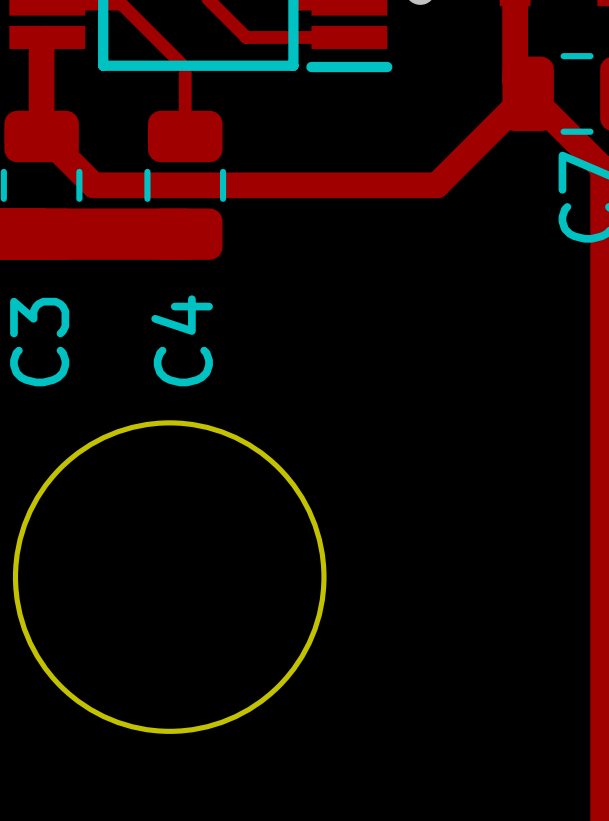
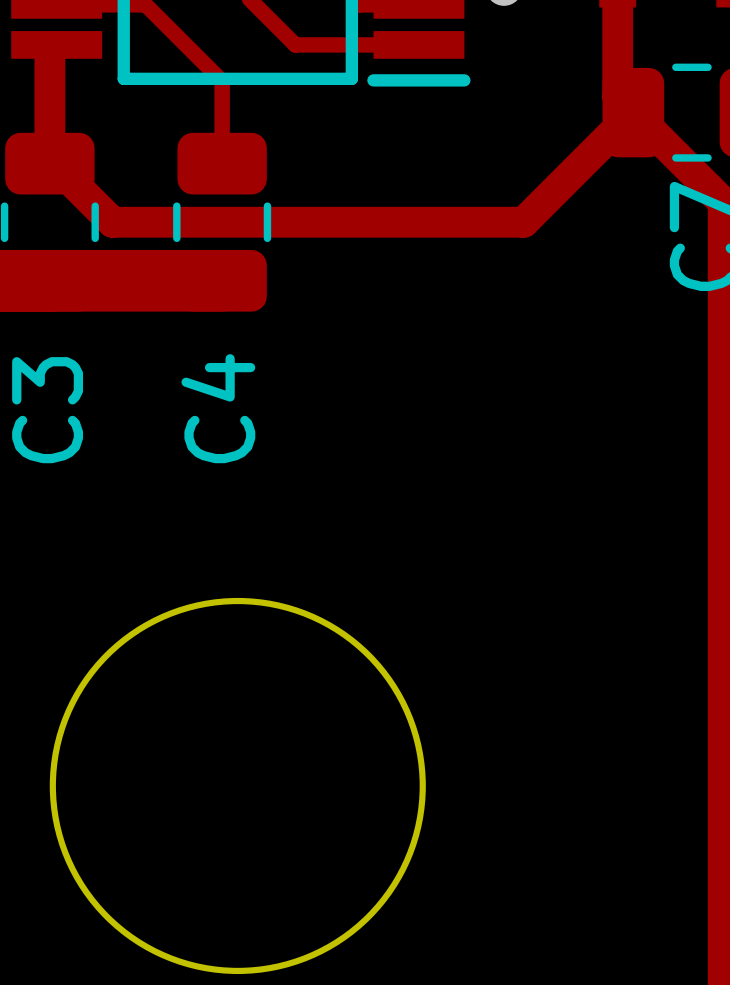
round board edge position: (169, 577) -> (237, 785)

